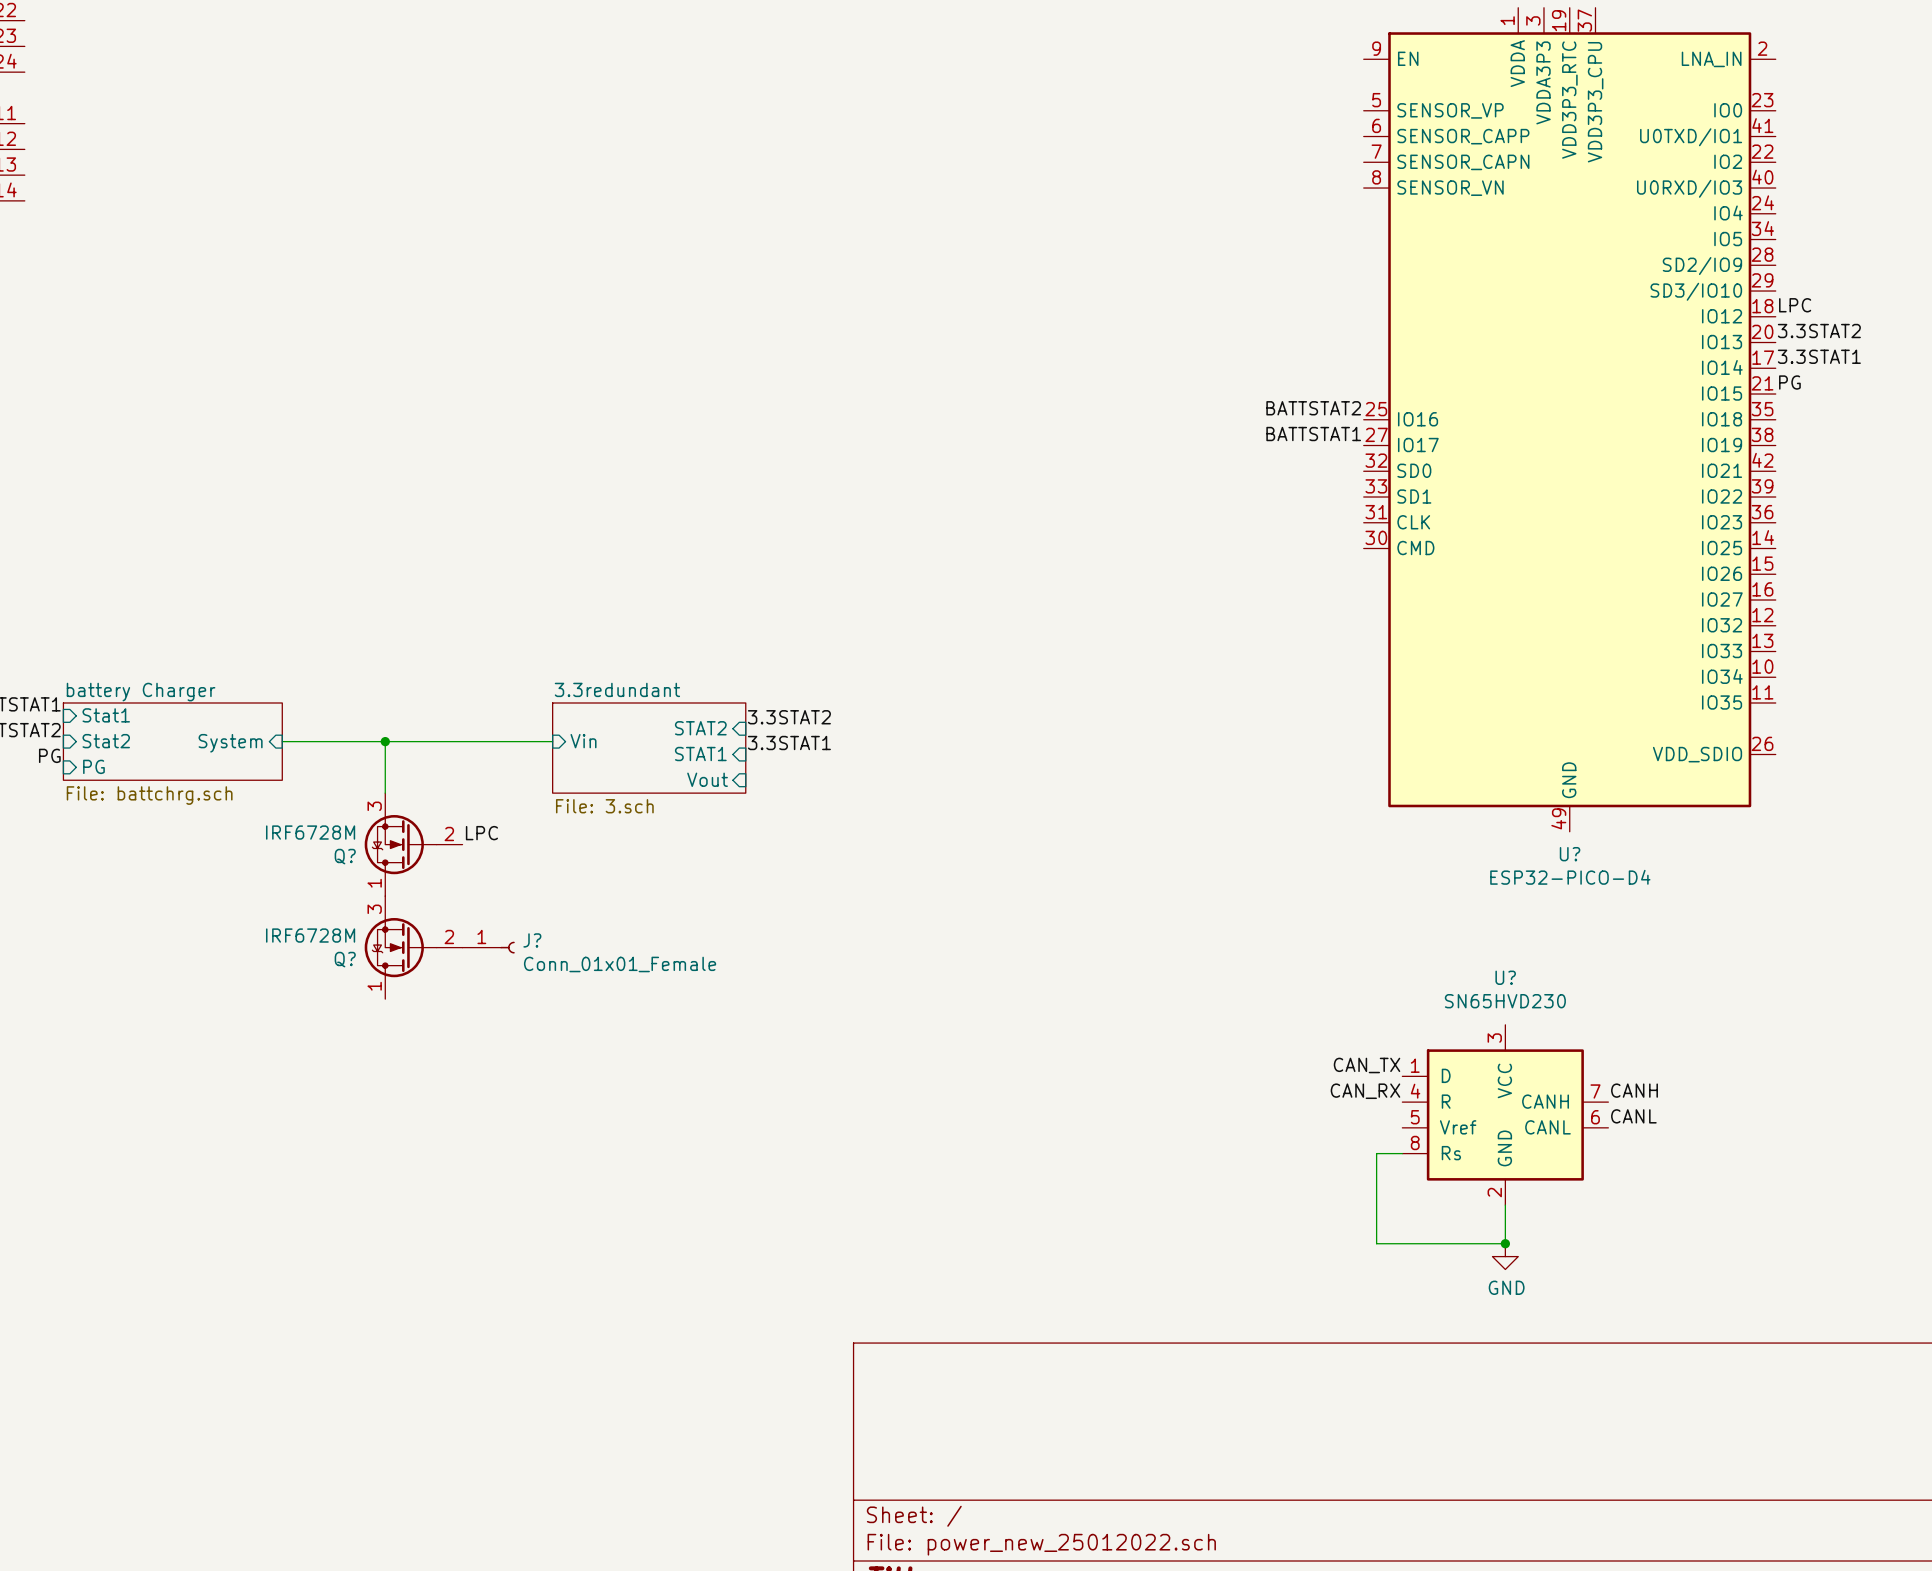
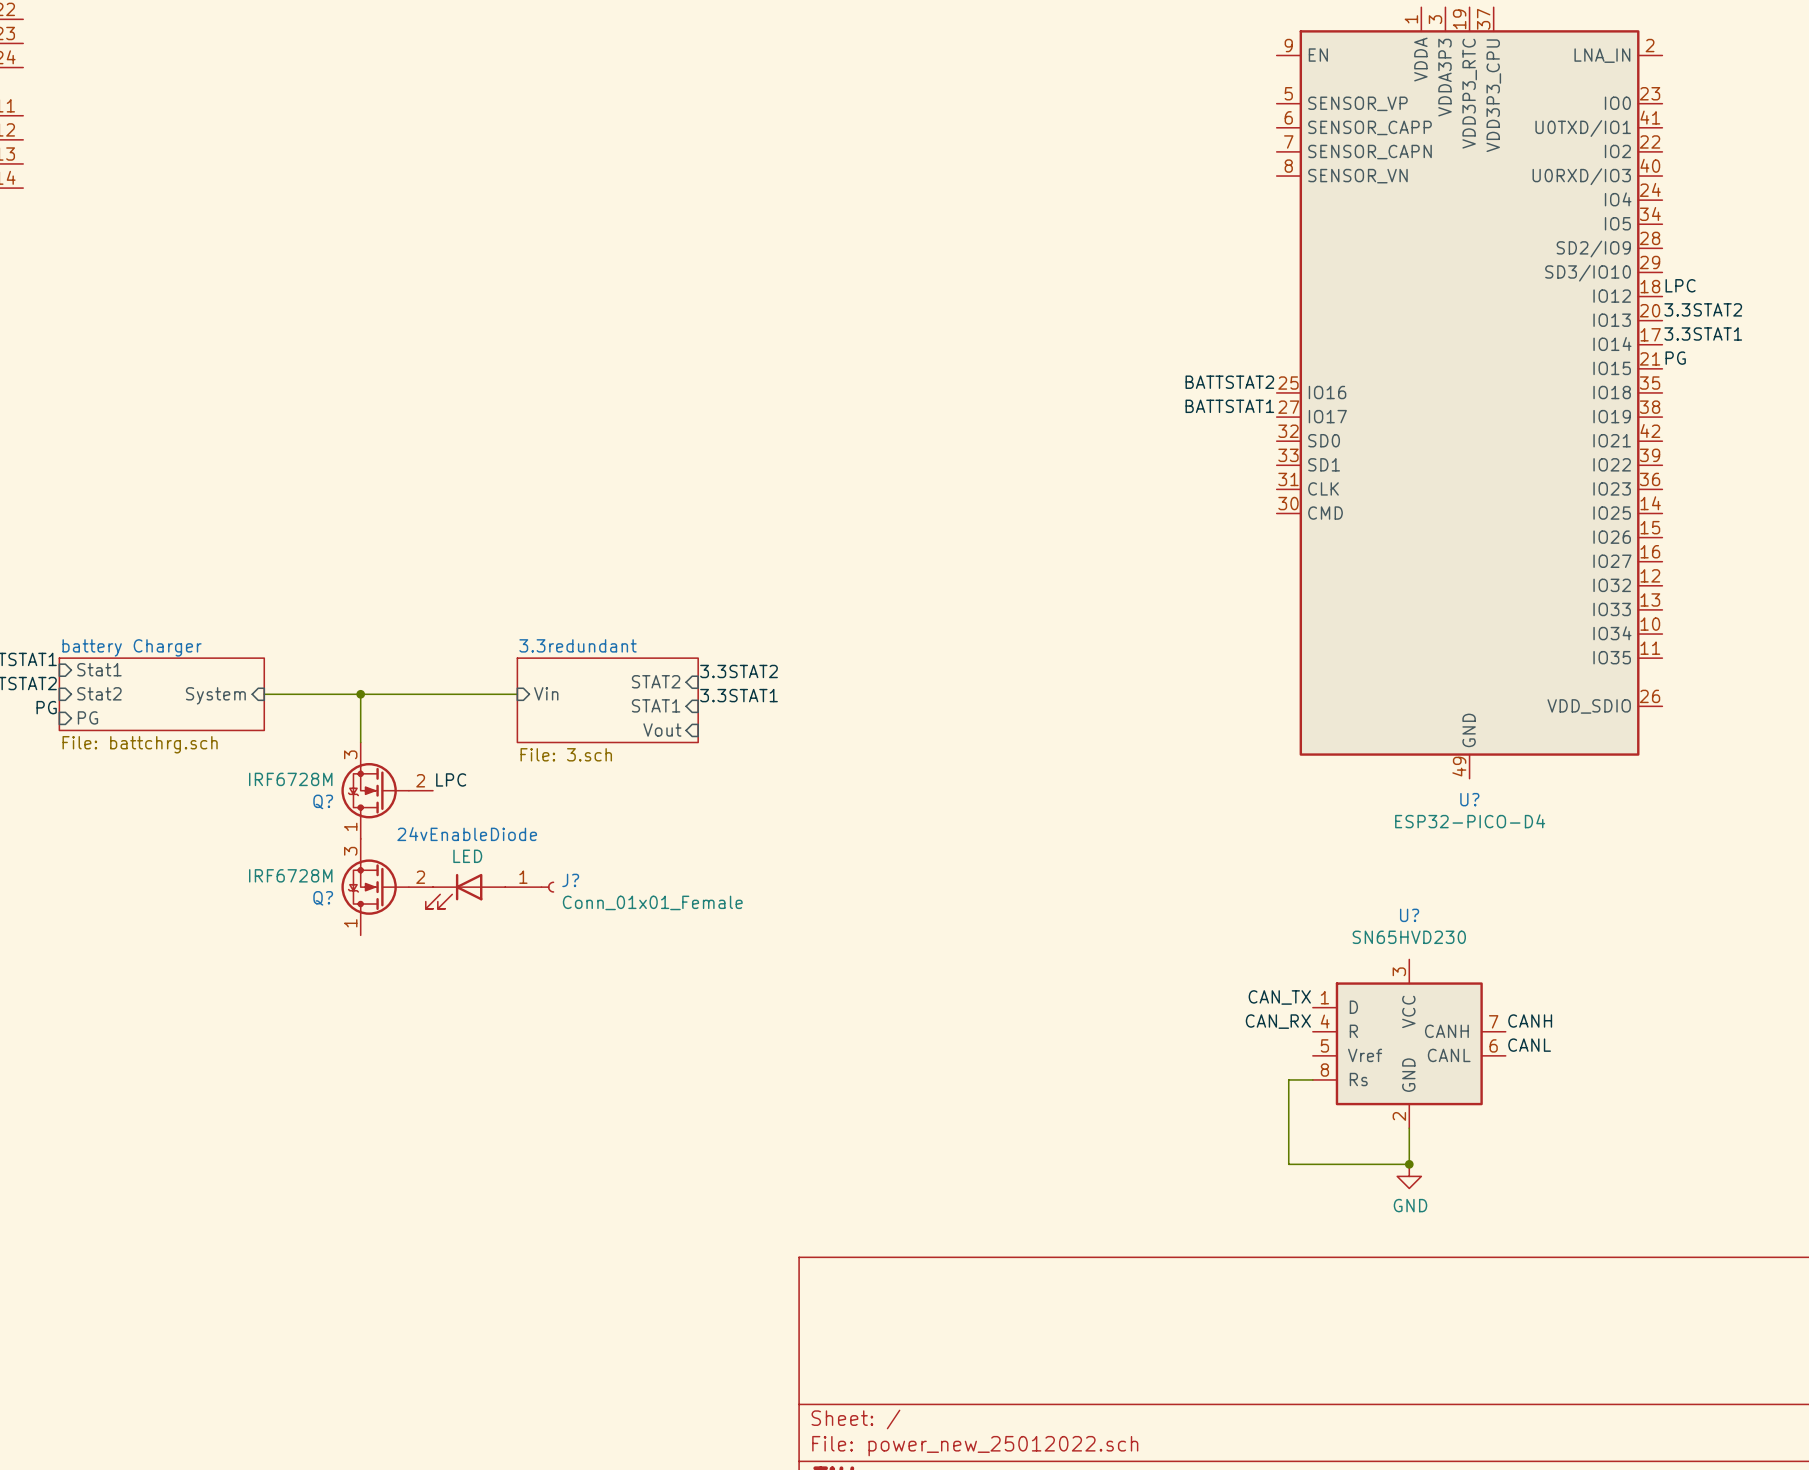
J? position: (488, 947) -> (529, 887)
24vEnableDiode: none -> LED (465, 891)

